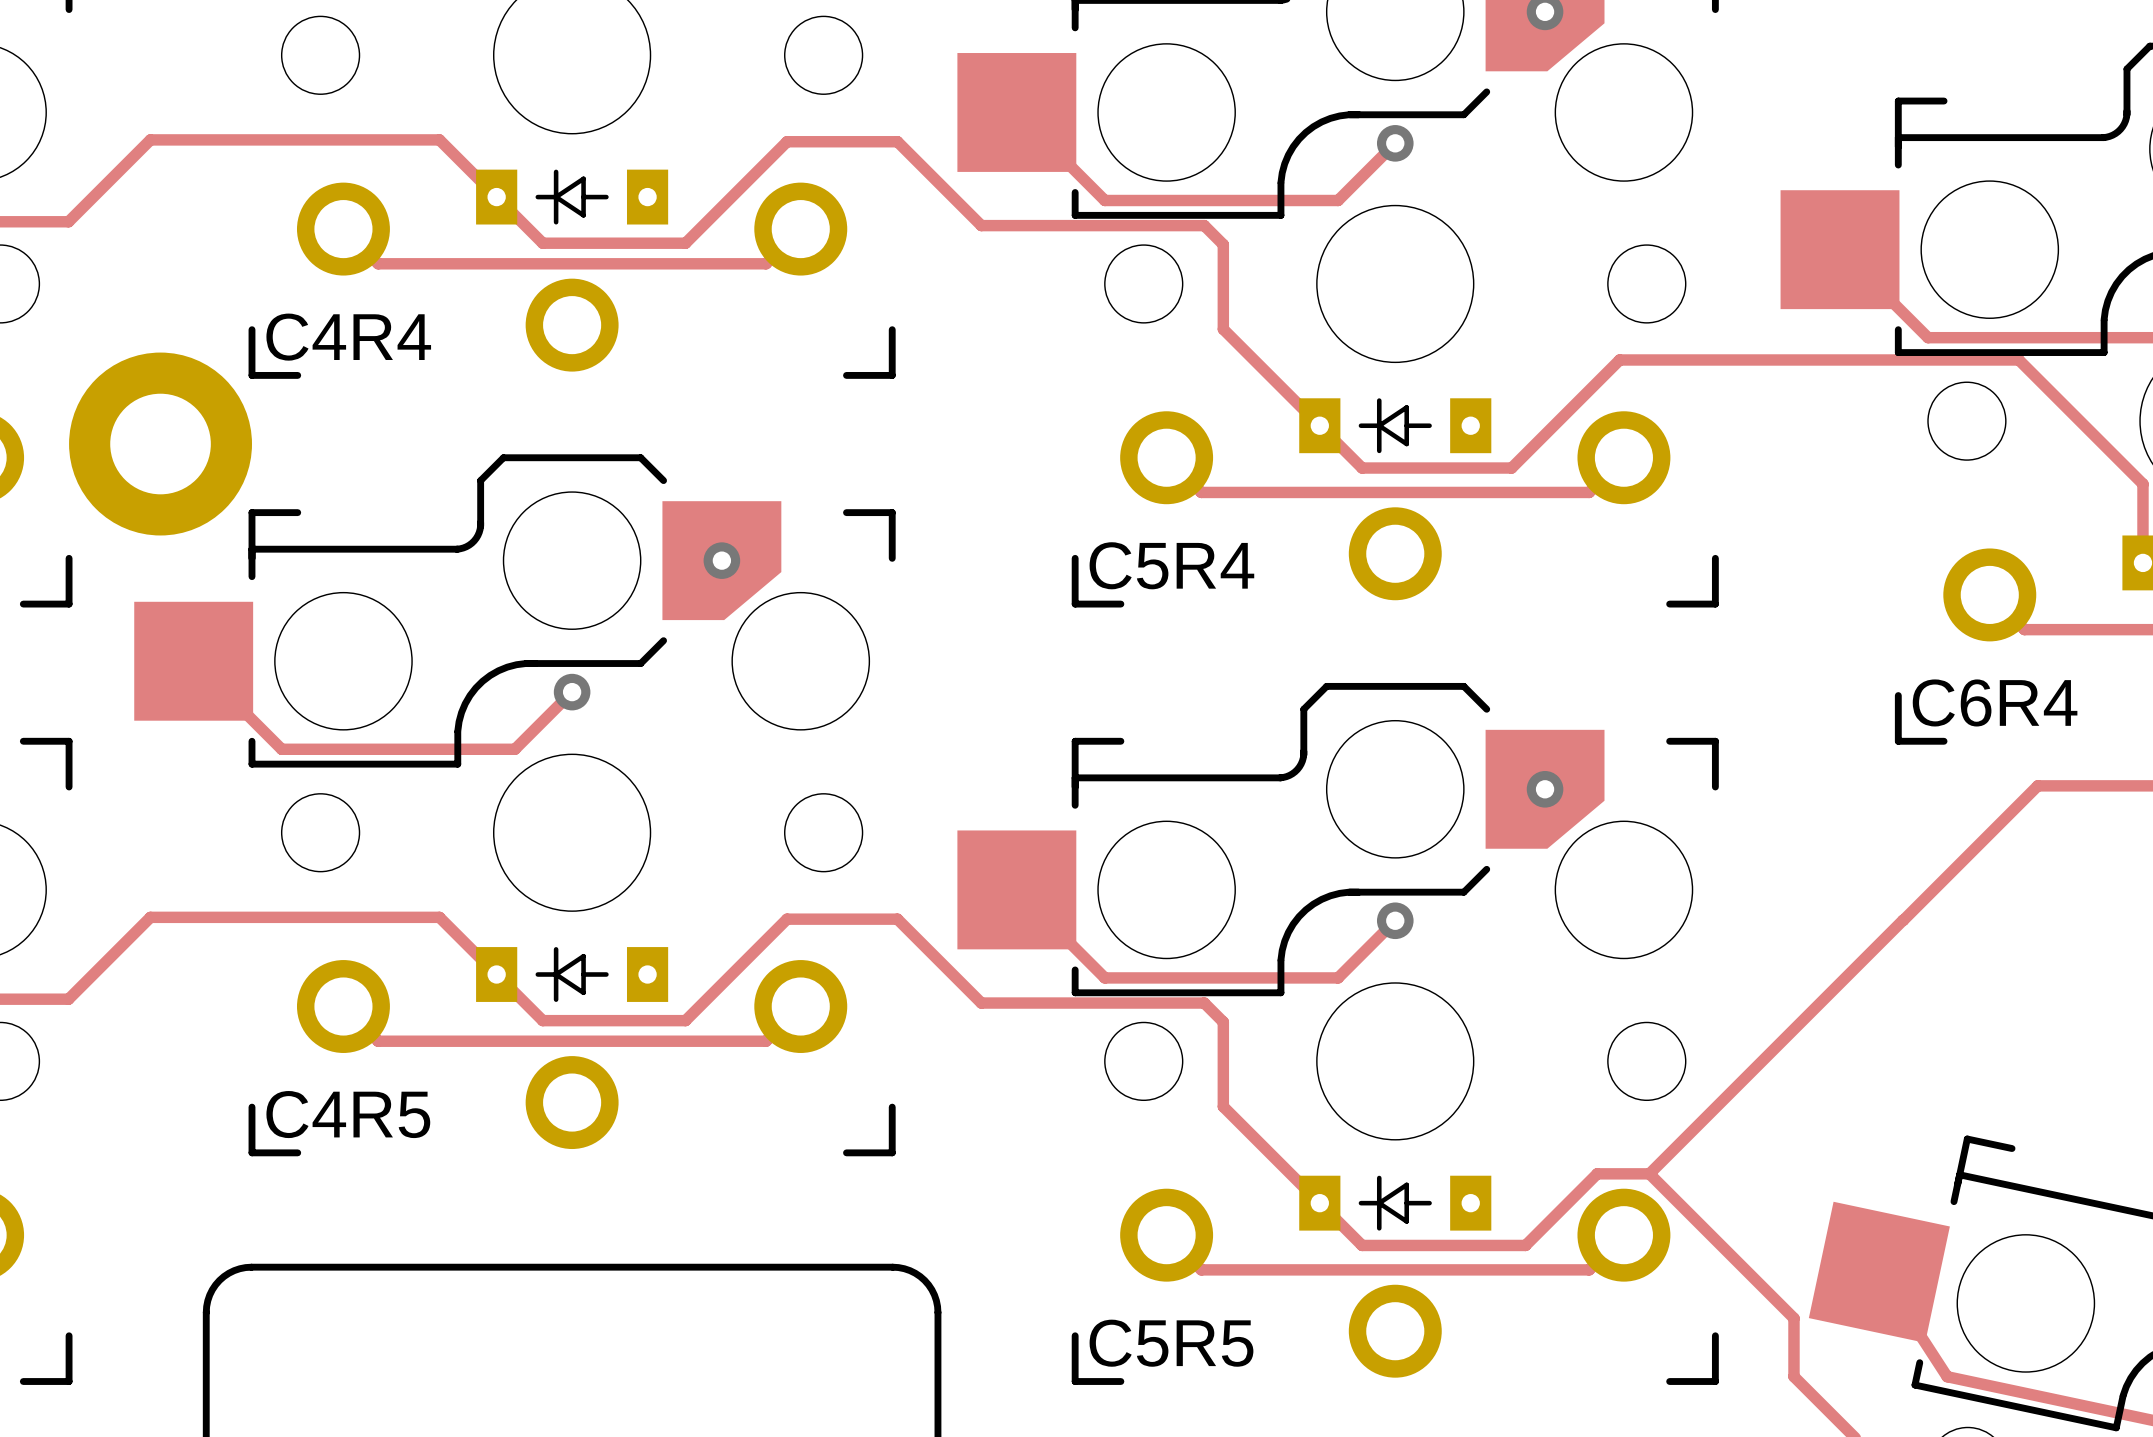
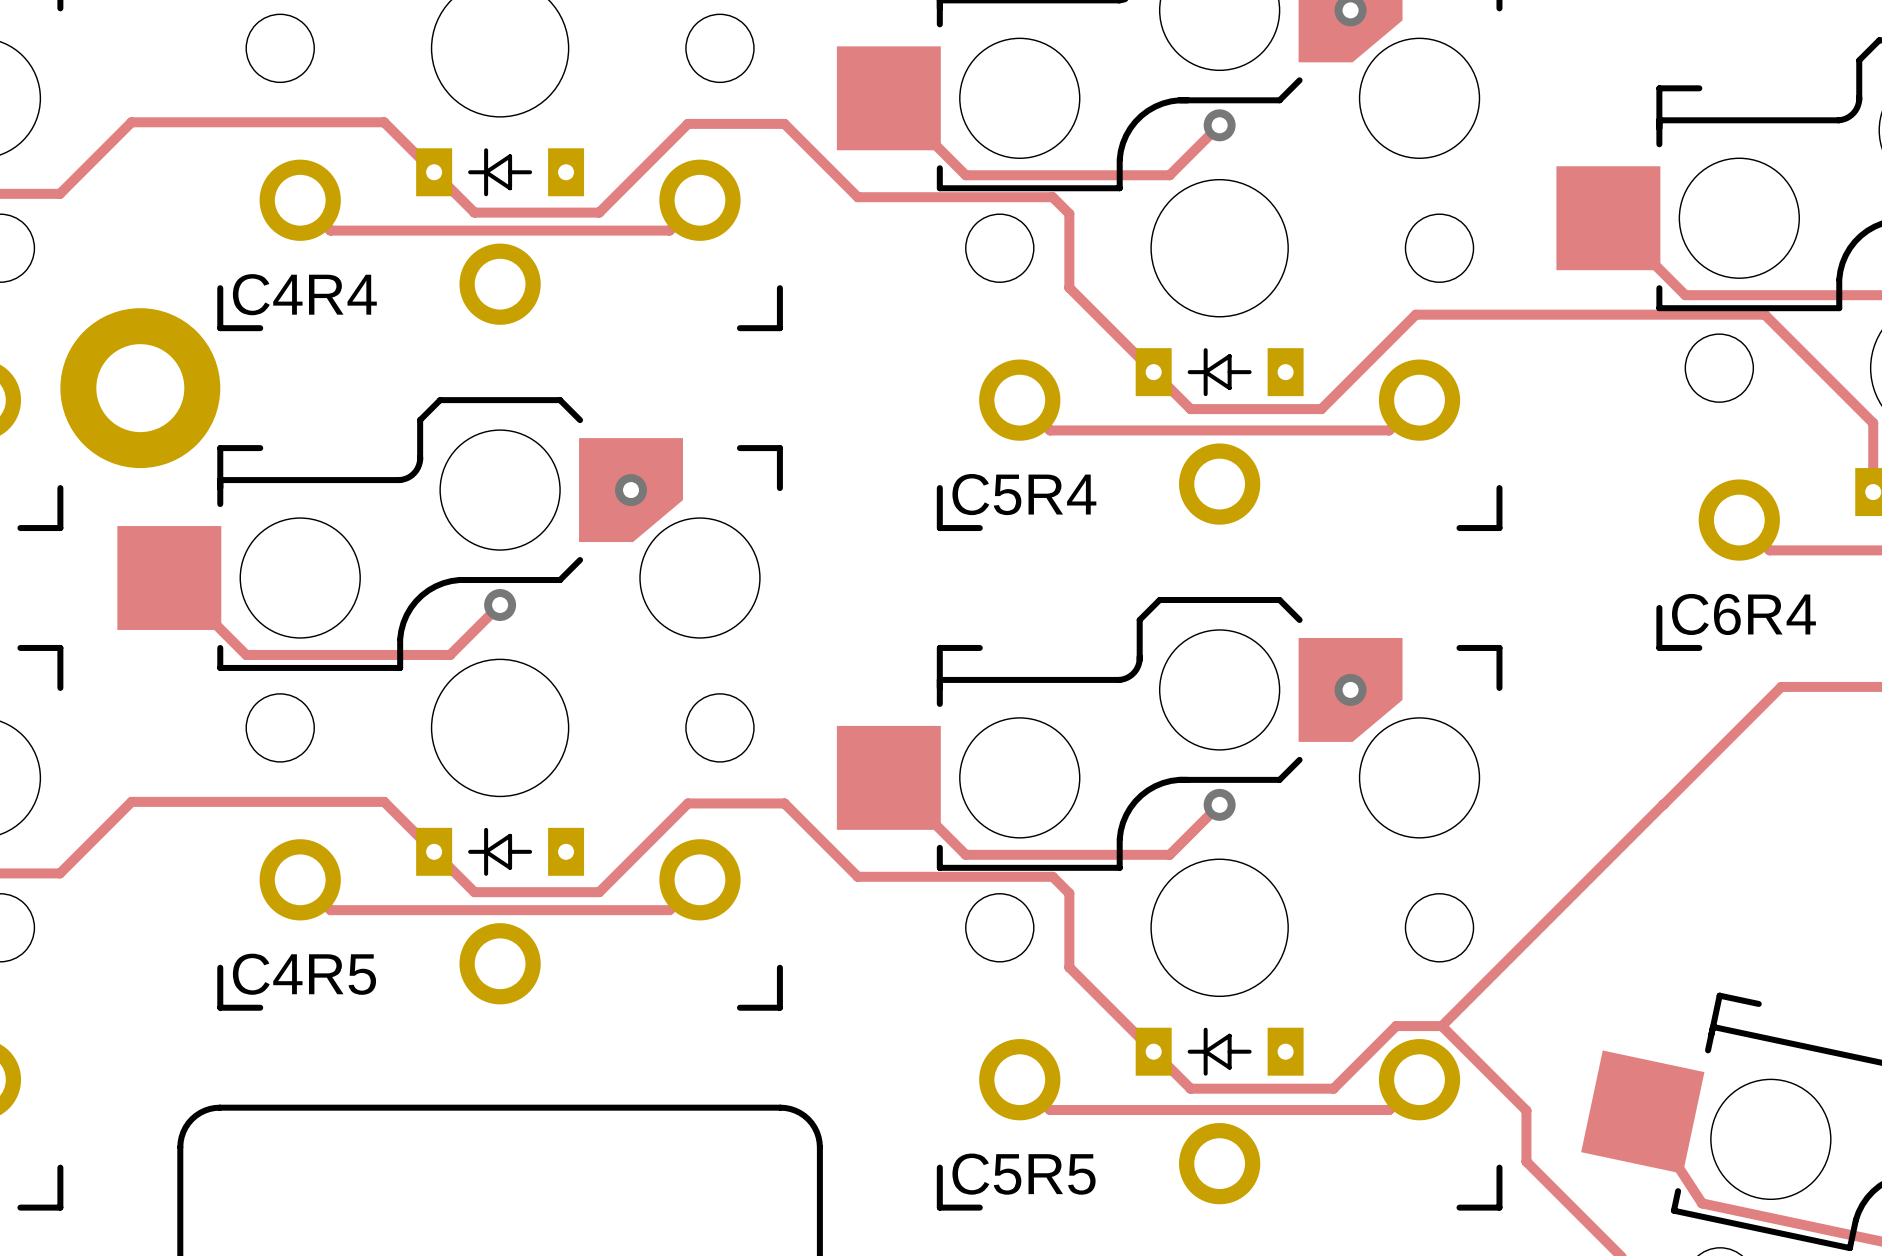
track: (1746, 1270) (1793, 1318) (1793, 1376) -> (1526, 1110) (1526, 1161) (1568, 1203)

